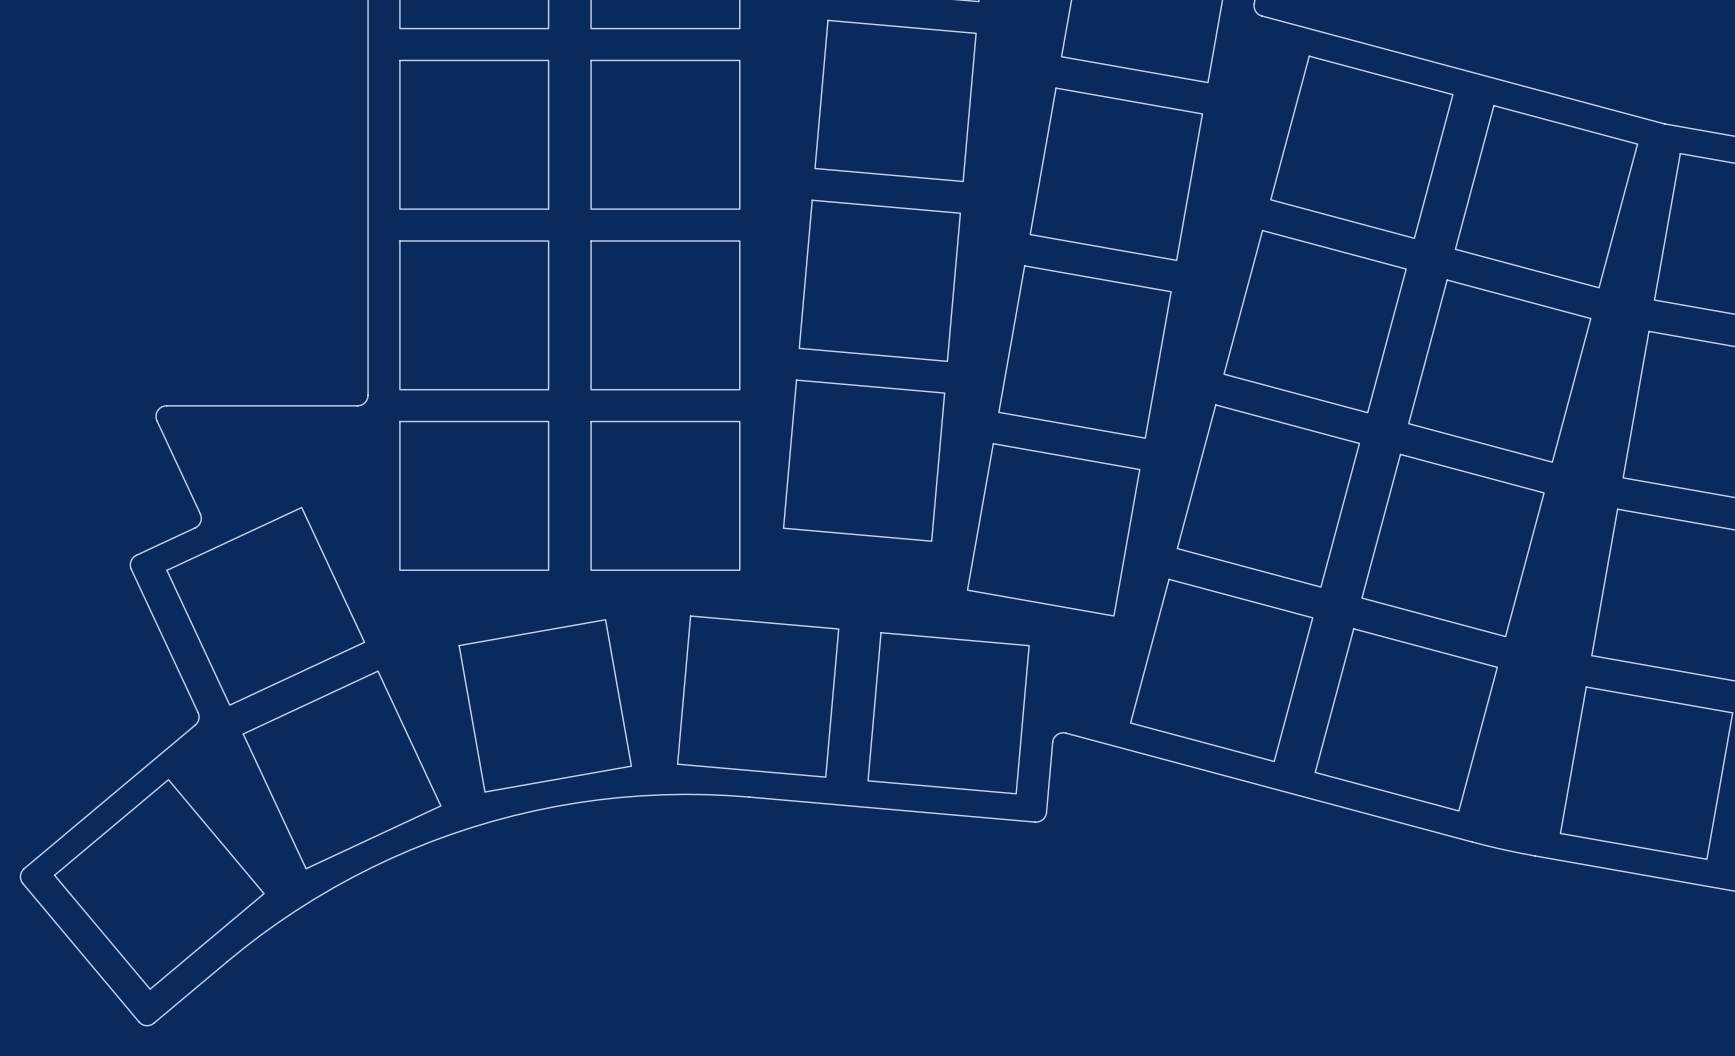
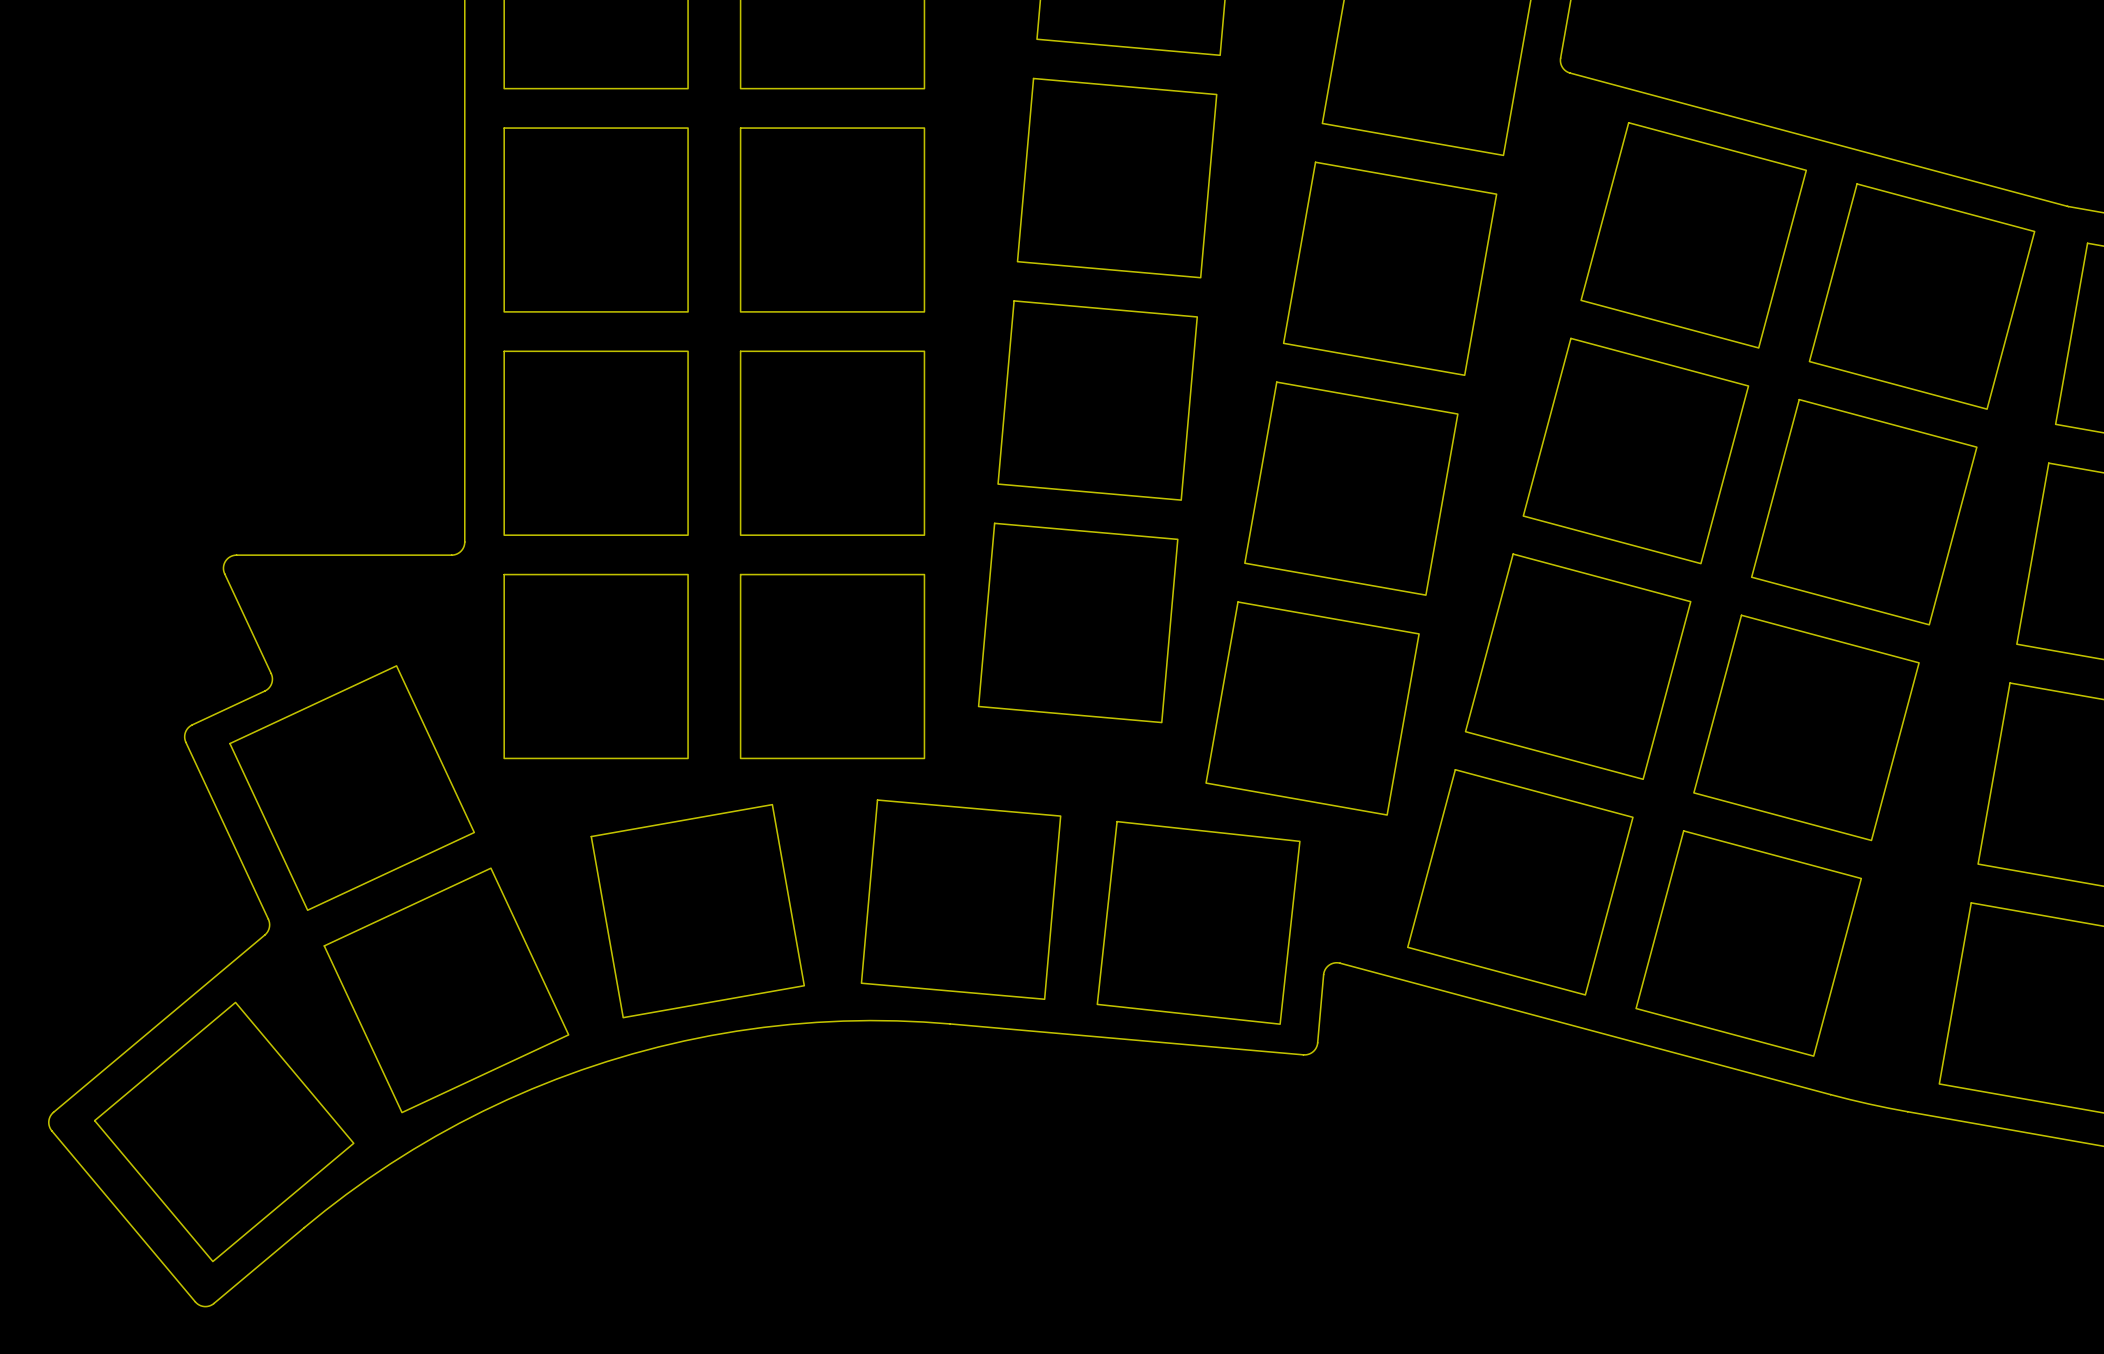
board edge: (183, 405) (162, 406) (157, 411) (156, 418) (200, 513) (200, 521) (195, 527) (135, 555) (130, 565) (198, 712) (198, 720) (195, 725) (24, 868) (20, 875) (22, 883) (138, 1021) (143, 1025) (152, 1023) (243, 948) (314, 898) (391, 858) (471, 827) (534, 810) (577, 802) (619, 797) (684, 794) (749, 797) (1037, 822) (1042, 819) (1046, 813) (1053, 738) (1062, 732) (1075, 735) -> (236, 555) (226, 559) (223, 565) (224, 572) (271, 673) (272, 682) (264, 691) (190, 725) (186, 730) (184, 737) (268, 919) (268, 929) (264, 934) (53, 1112) (48, 1121) (51, 1130) (195, 1301) (200, 1305) (207, 1306) (213, 1303) (325, 1210) (368, 1178) (412, 1149) (459, 1123) (507, 1099) (556, 1079) (607, 1061) (684, 1040) (737, 1031) (816, 1022) (870, 1020) (950, 1023) (1306, 1054) (1313, 1051) (1317, 1044) (1324, 971) (1330, 964) (1340, 963)
drawing position: (265, 606) -> (352, 788)
drawing: none -> [1096, 820, 1301, 1025]
drawing: [867, 632, 1030, 795] -> none
drawing position: (758, 696) -> (961, 899)
drawing position: (545, 705) -> (697, 911)
drawing position: (342, 769) -> (446, 990)
drawing position: (159, 884) -> (224, 1131)

